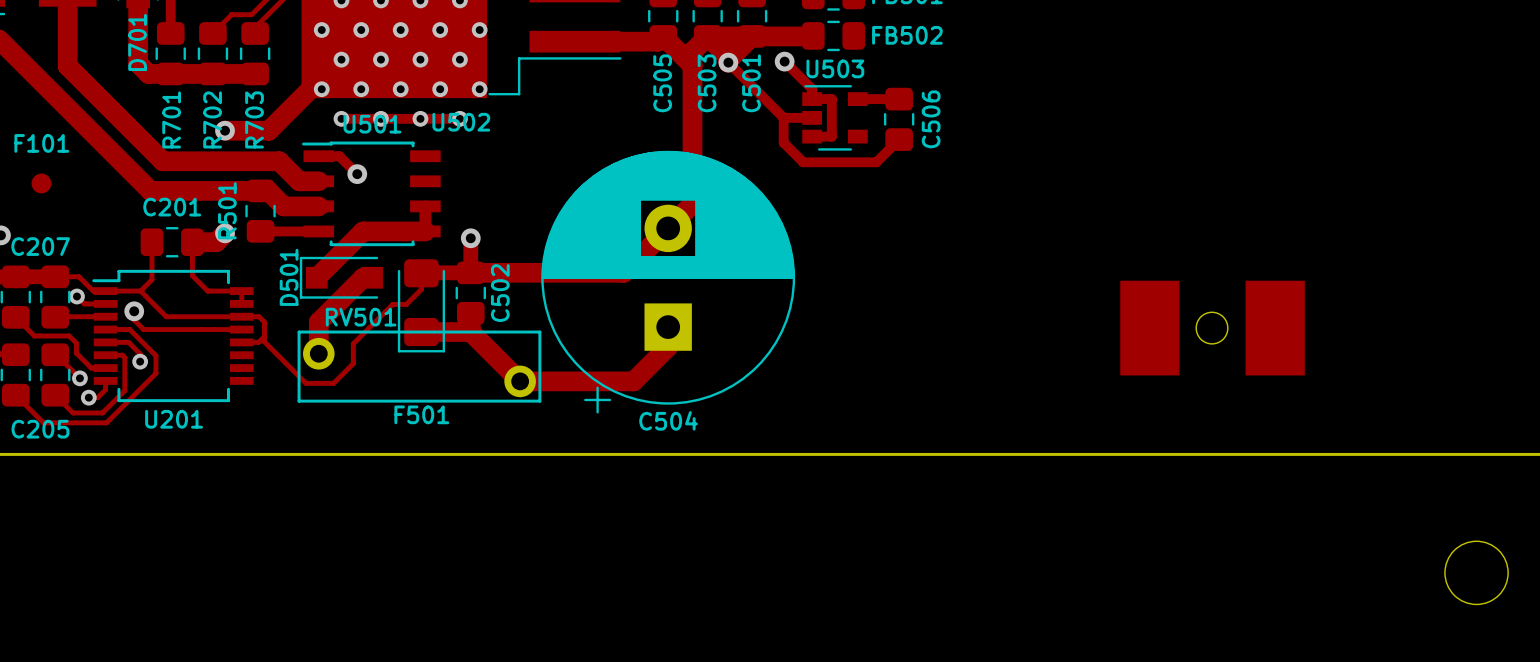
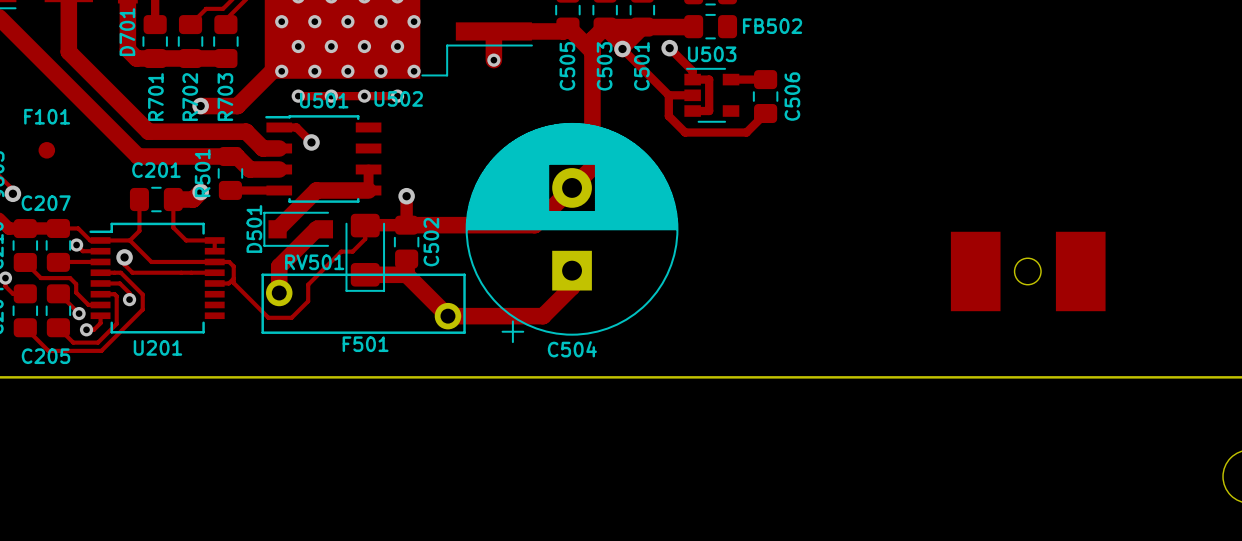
track: none -> (493, 31) (493, 60)
via: none -> (493, 60)

